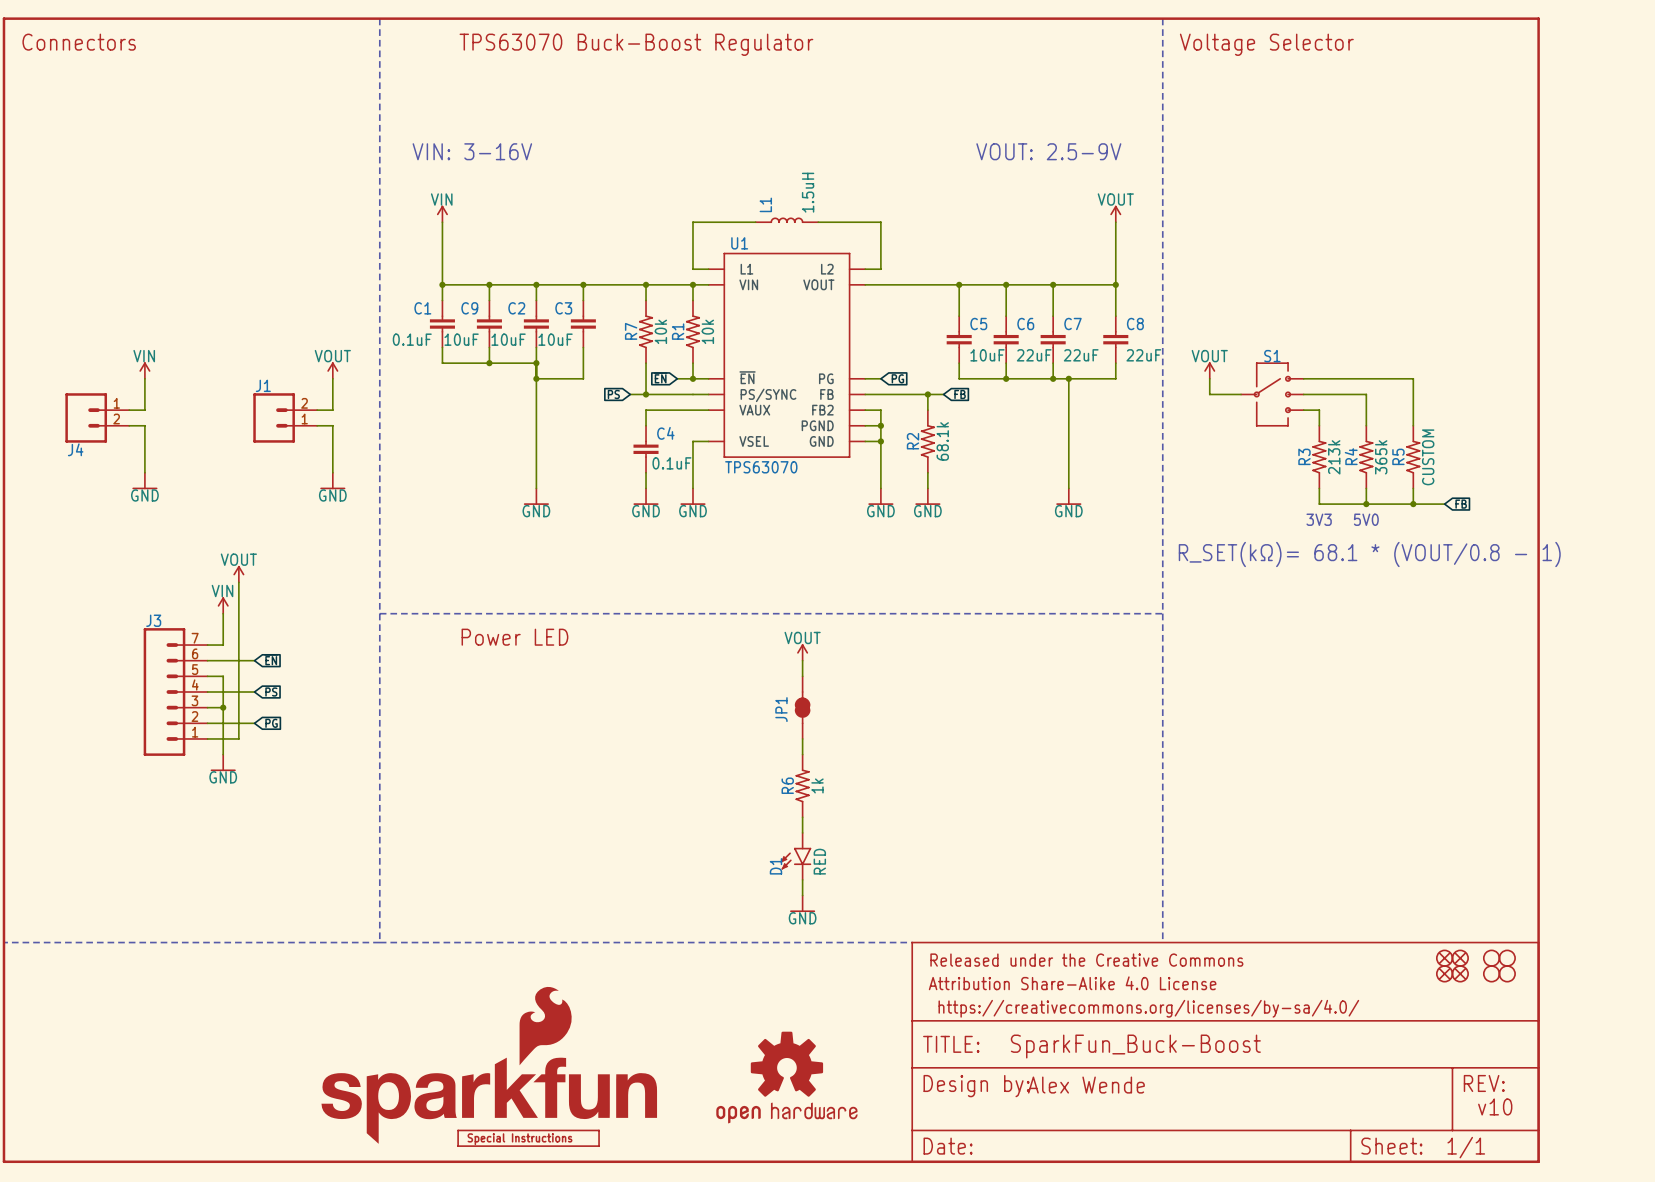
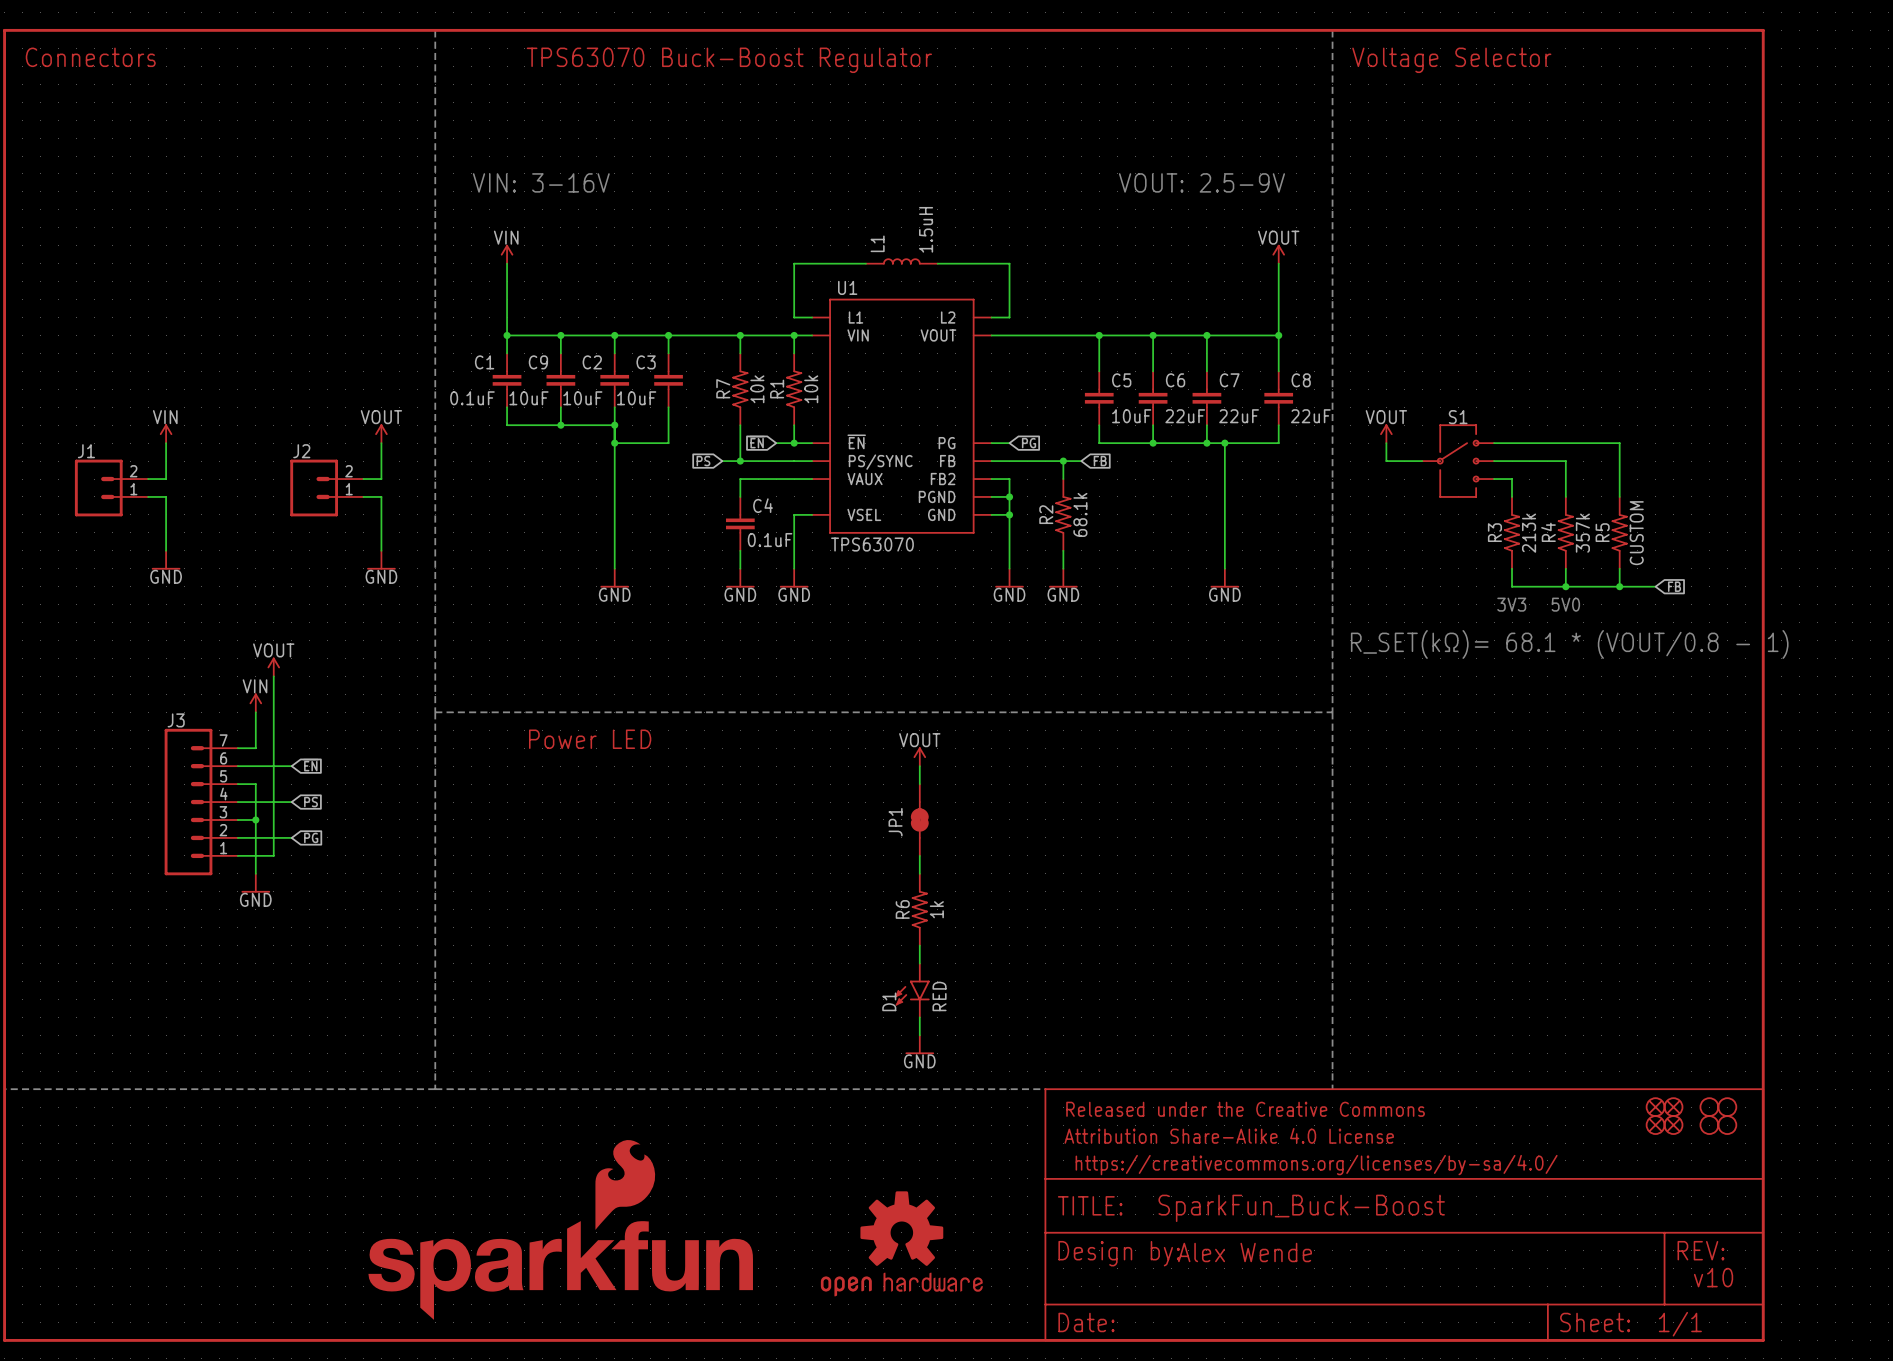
J1 name: J1 (263, 385) -> J2 (301, 451)
J4 flip: as is (86, 417) -> up-down (98, 488)
J4 name: J4 (75, 449) -> J1 (86, 451)
R4 value: 365k (1381, 457) -> 357k (1582, 533)
part: (528, 1138) -> none

